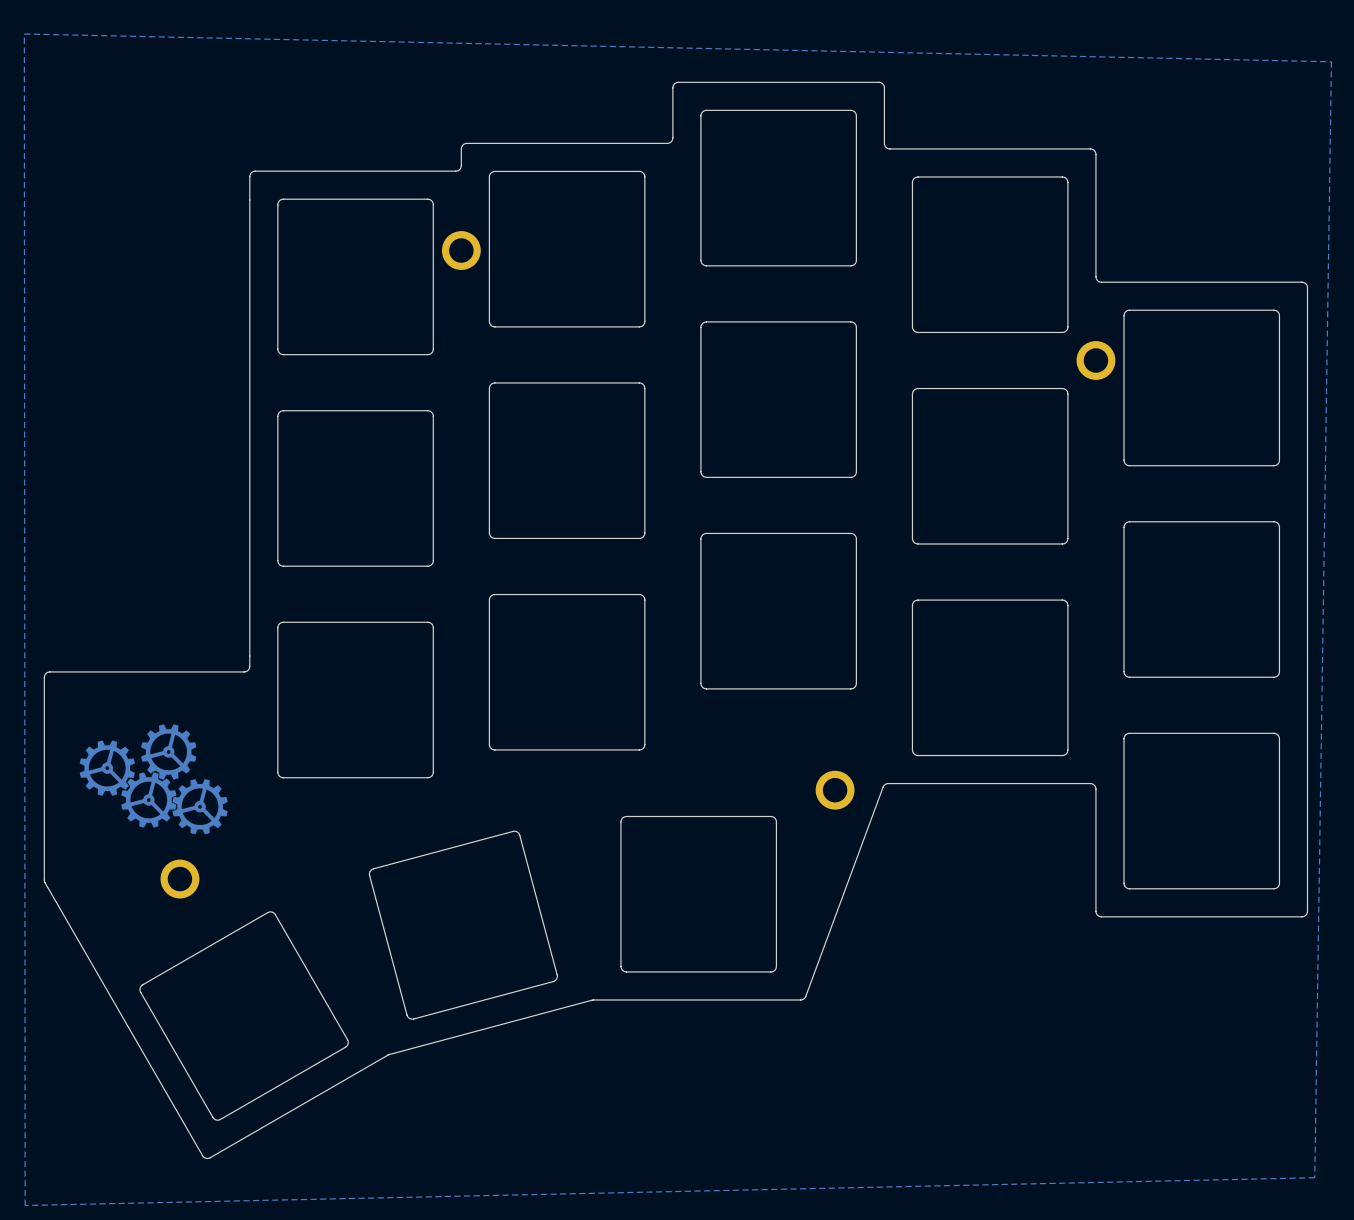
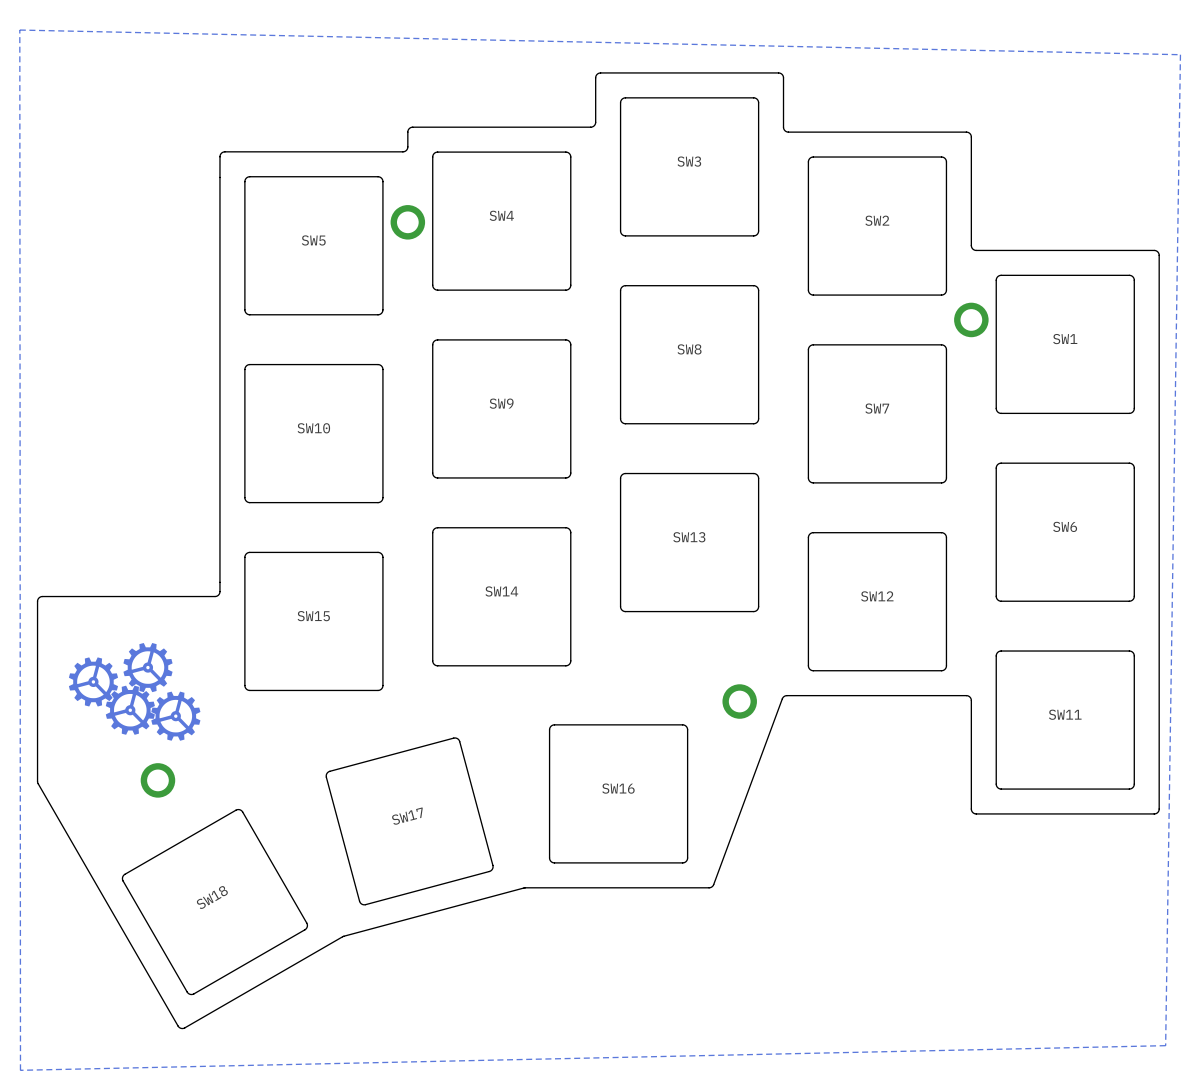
SW3: none -> (689, 166)
SW4: none -> (501, 221)
SW2: none -> (877, 226)
SW5: none -> (313, 245)
SW1: none -> (1065, 344)
SW8: none -> (689, 354)
SW9: none -> (501, 408)
SW7: none -> (877, 413)
SW10: none -> (313, 433)
SW6: none -> (1065, 532)
SW13: none -> (689, 542)
SW14: none -> (501, 596)
SW12: none -> (877, 601)
SW15: none -> (313, 621)
SW11: none -> (1065, 720)
SW16: none -> (618, 793)
SW17: none -> (409, 821)
SW18: none -> (214, 902)

